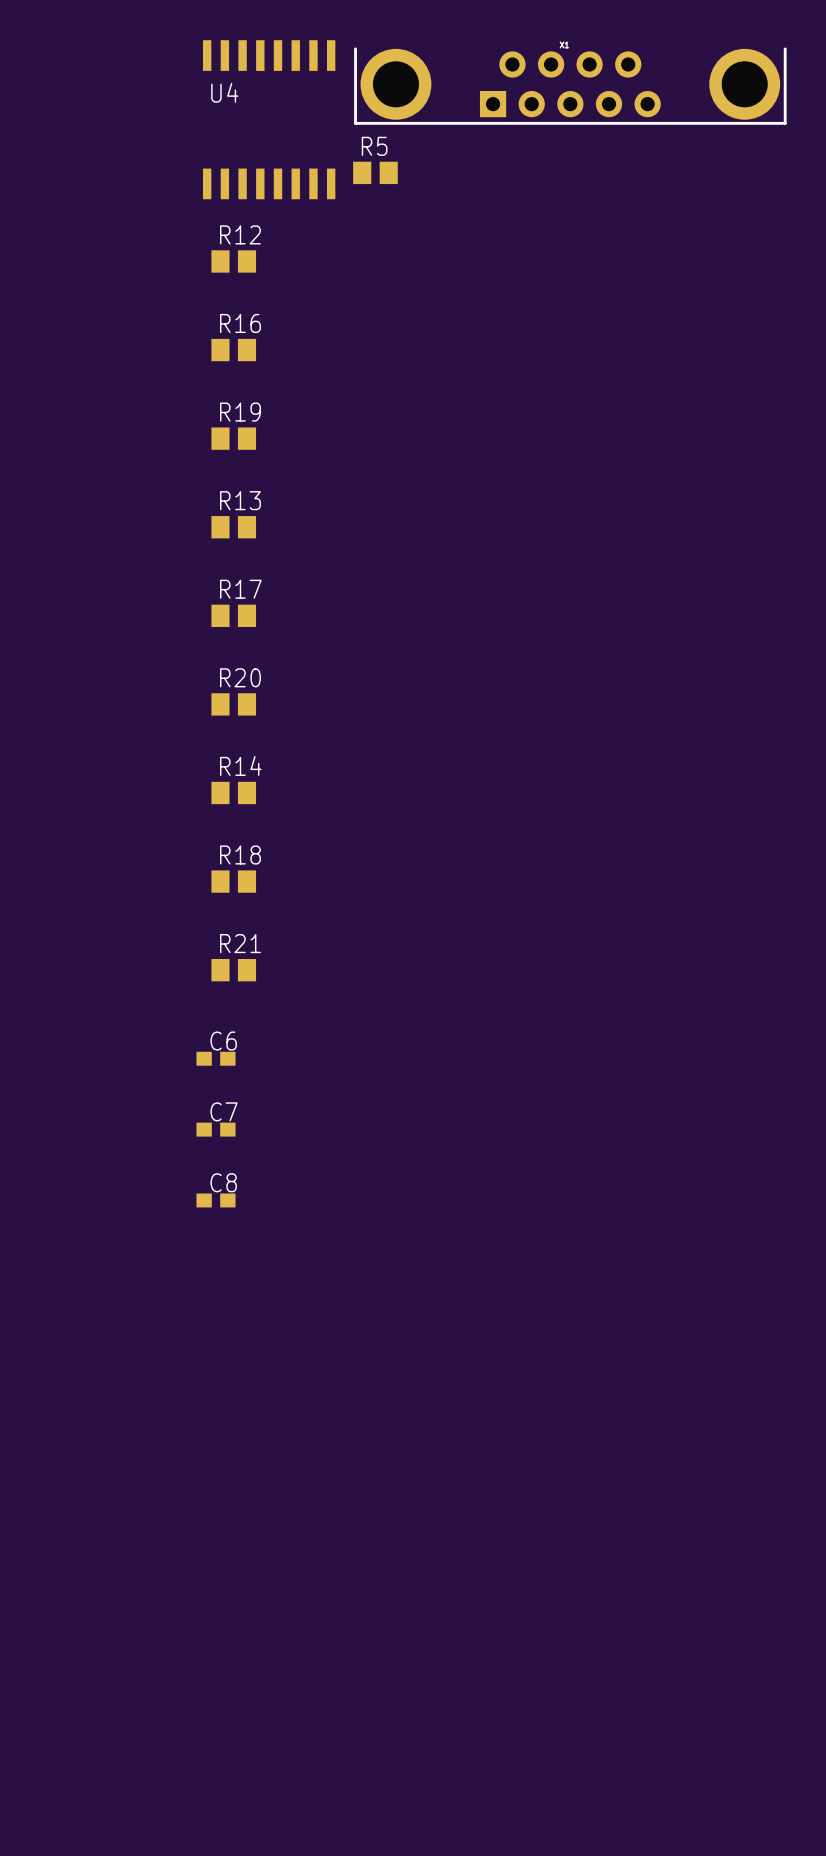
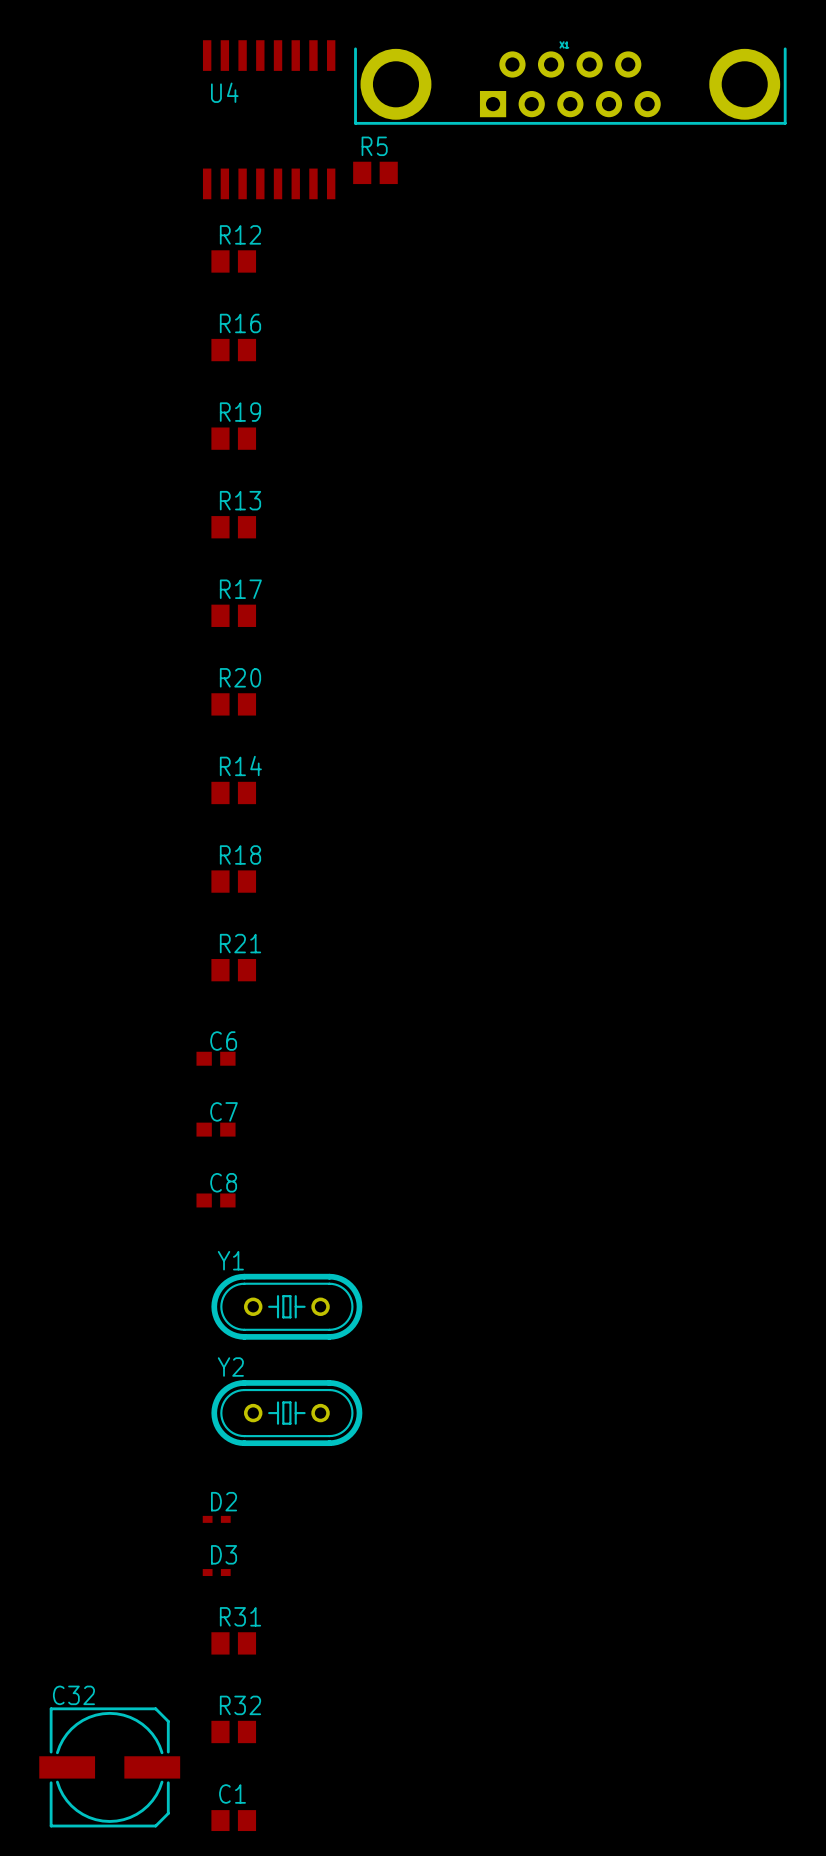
Y1: none -> (286, 1306)
Y2: none -> (286, 1413)
D2: none -> (216, 1519)
D3: none -> (216, 1572)
R31: none -> (233, 1643)
R32: none -> (233, 1731)
C32: none -> (109, 1767)
C1: none -> (233, 1820)

